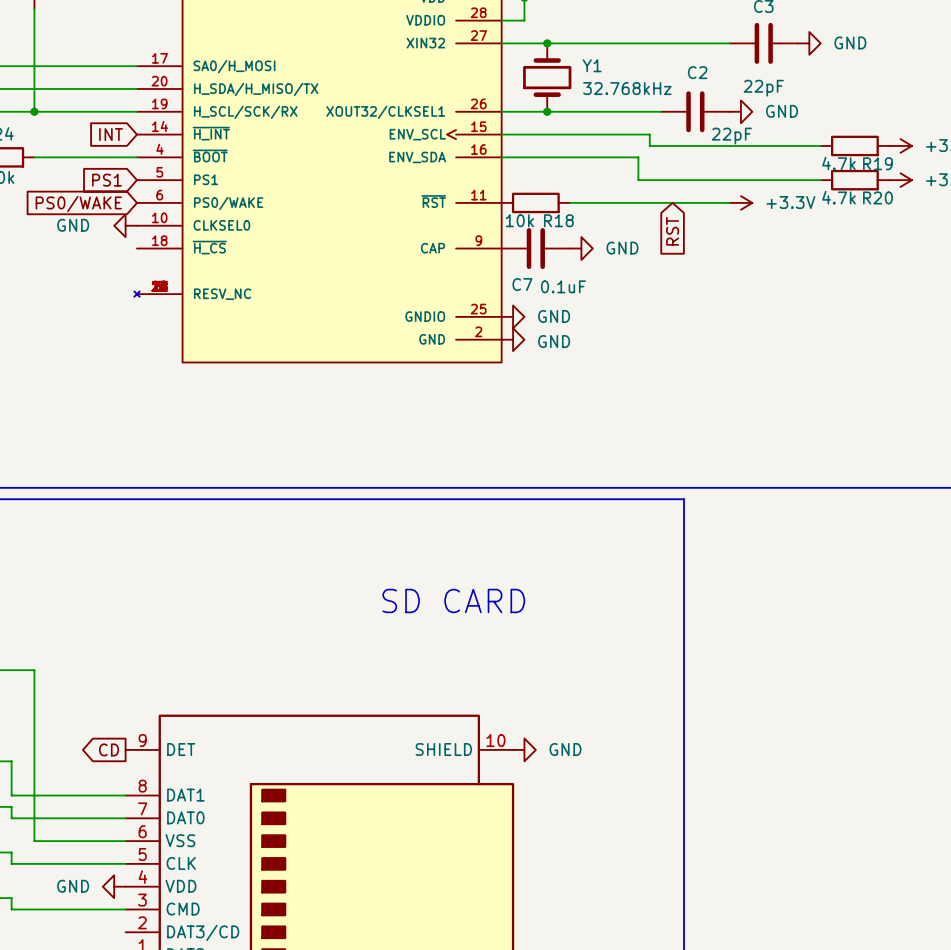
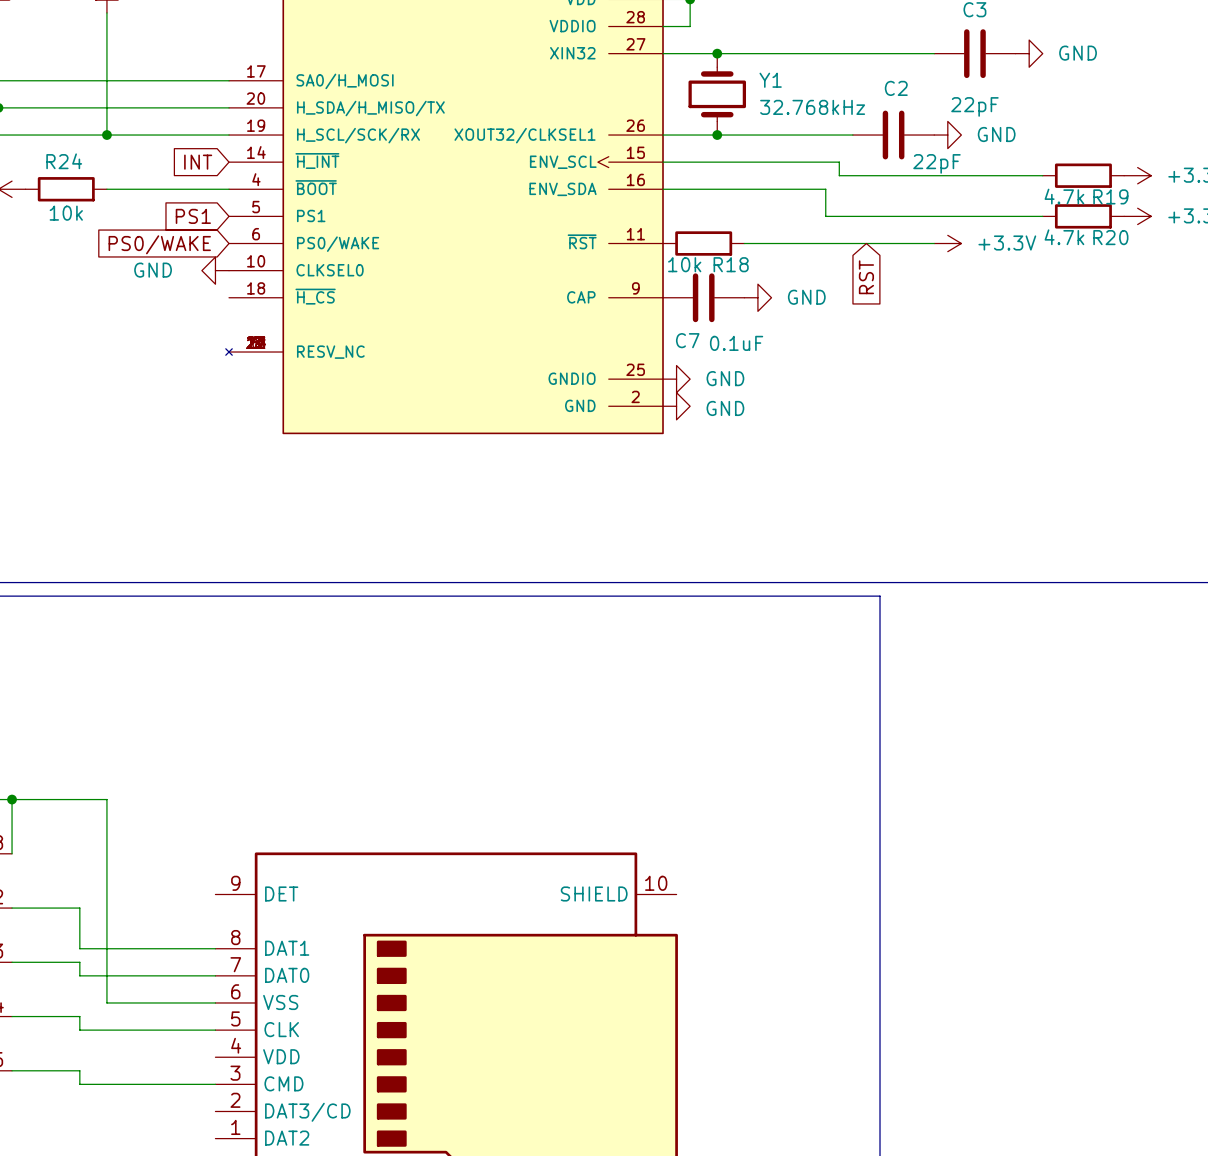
text: SD CARD (453, 600) -> none
global label: CD (109, 749) -> none
power symbol: GND (524, 749) -> none
power symbol: GND (114, 886) -> none

